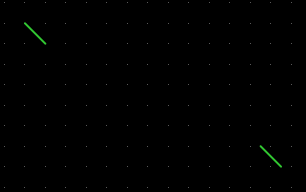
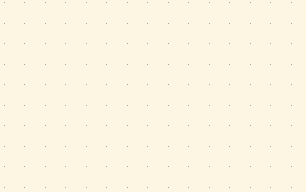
wire: (24, 23) (45, 43) -> none
wire: (260, 146) (281, 166) -> none

